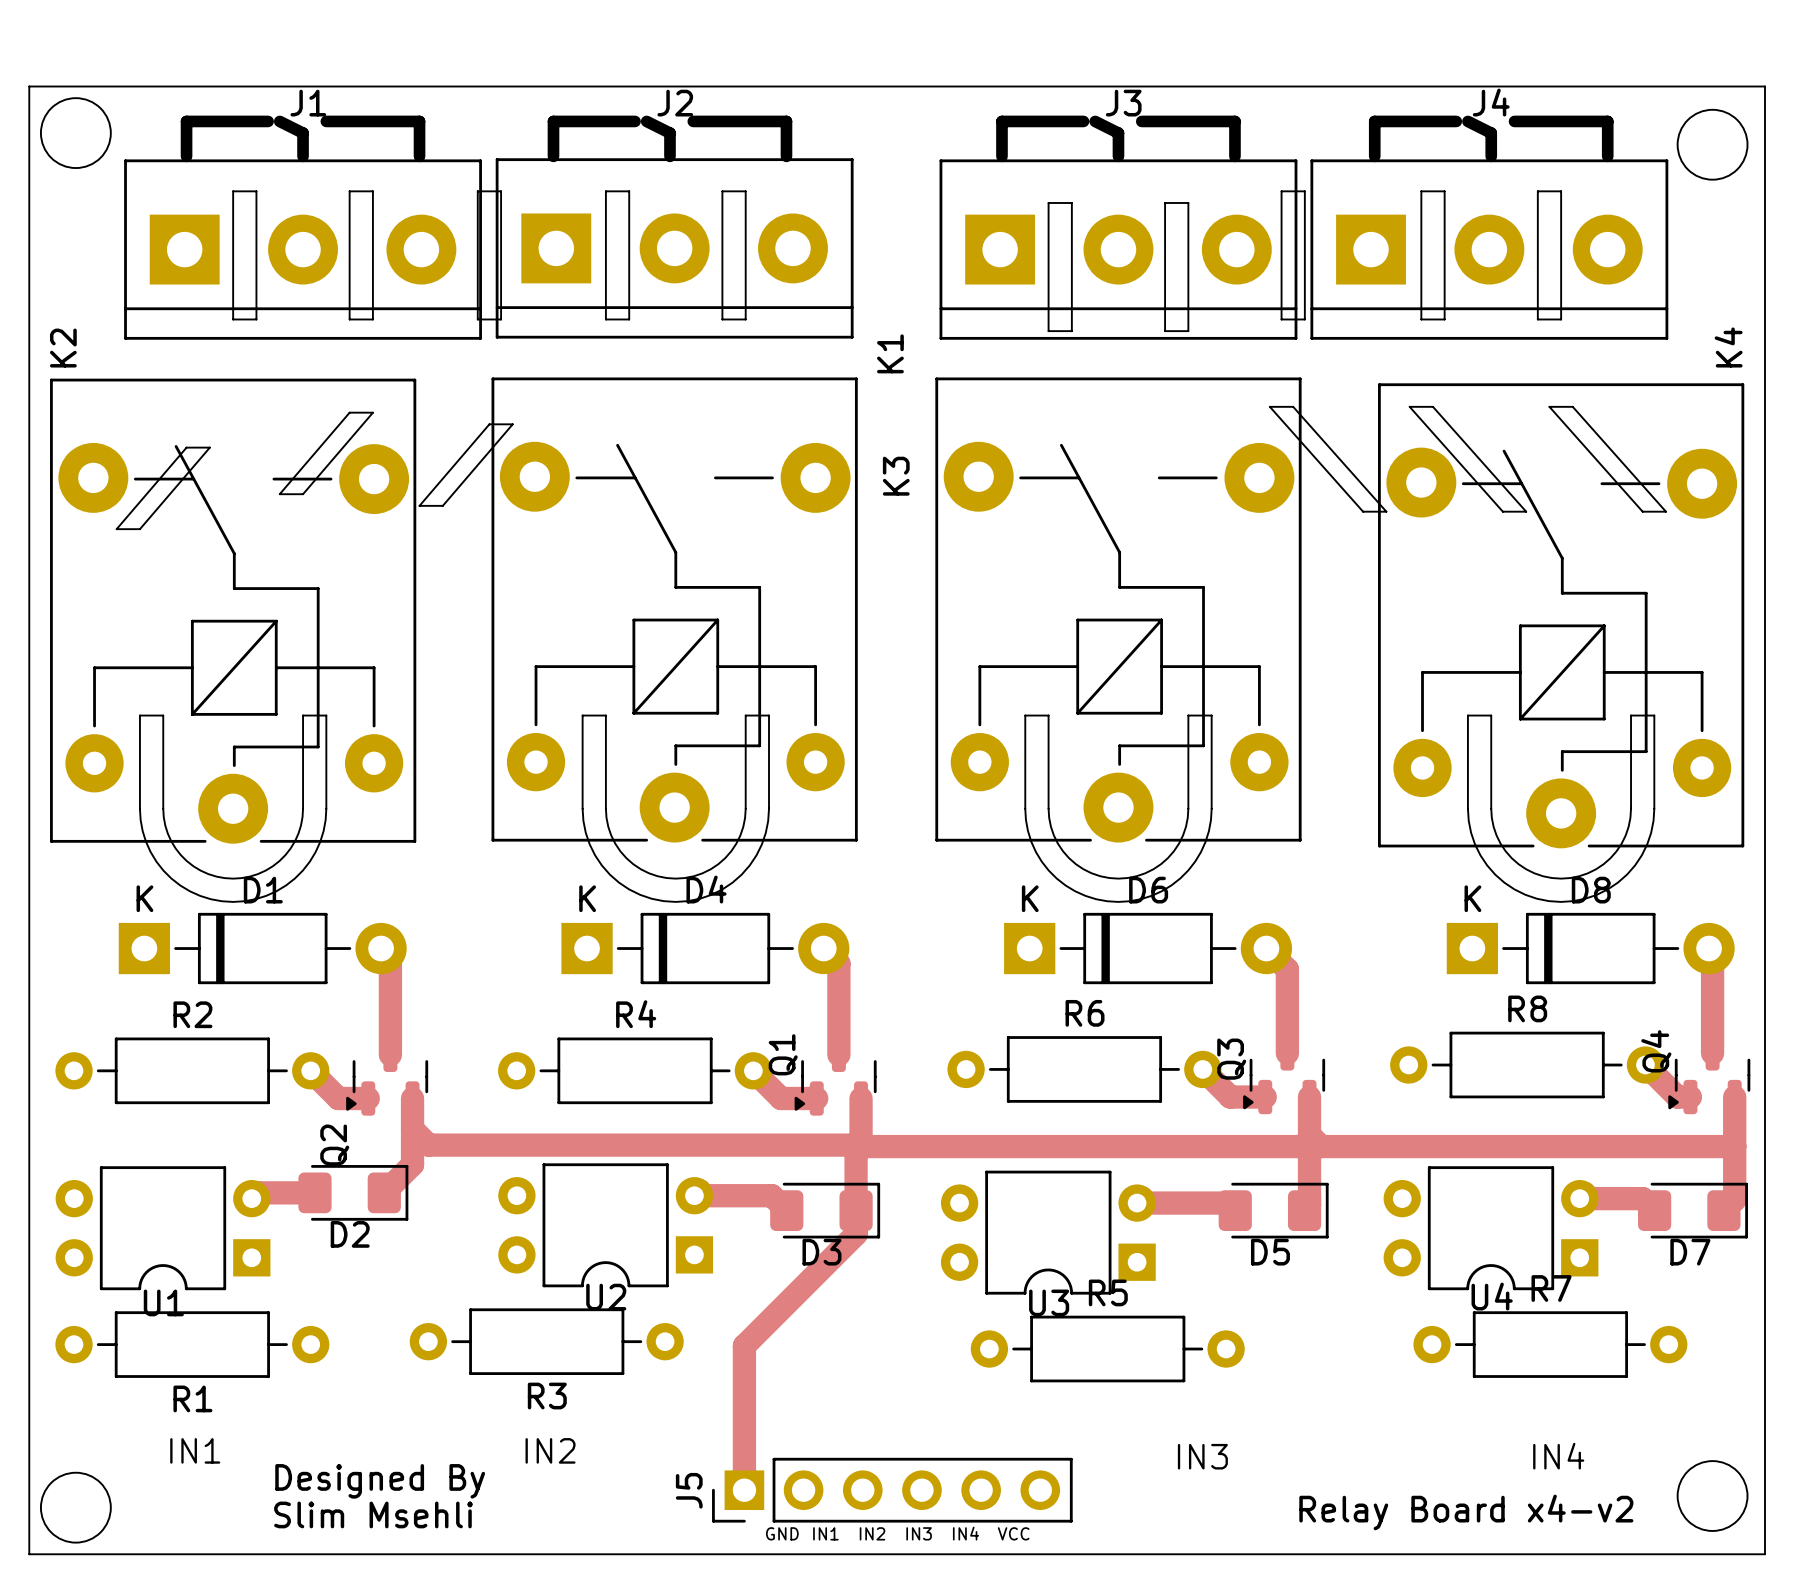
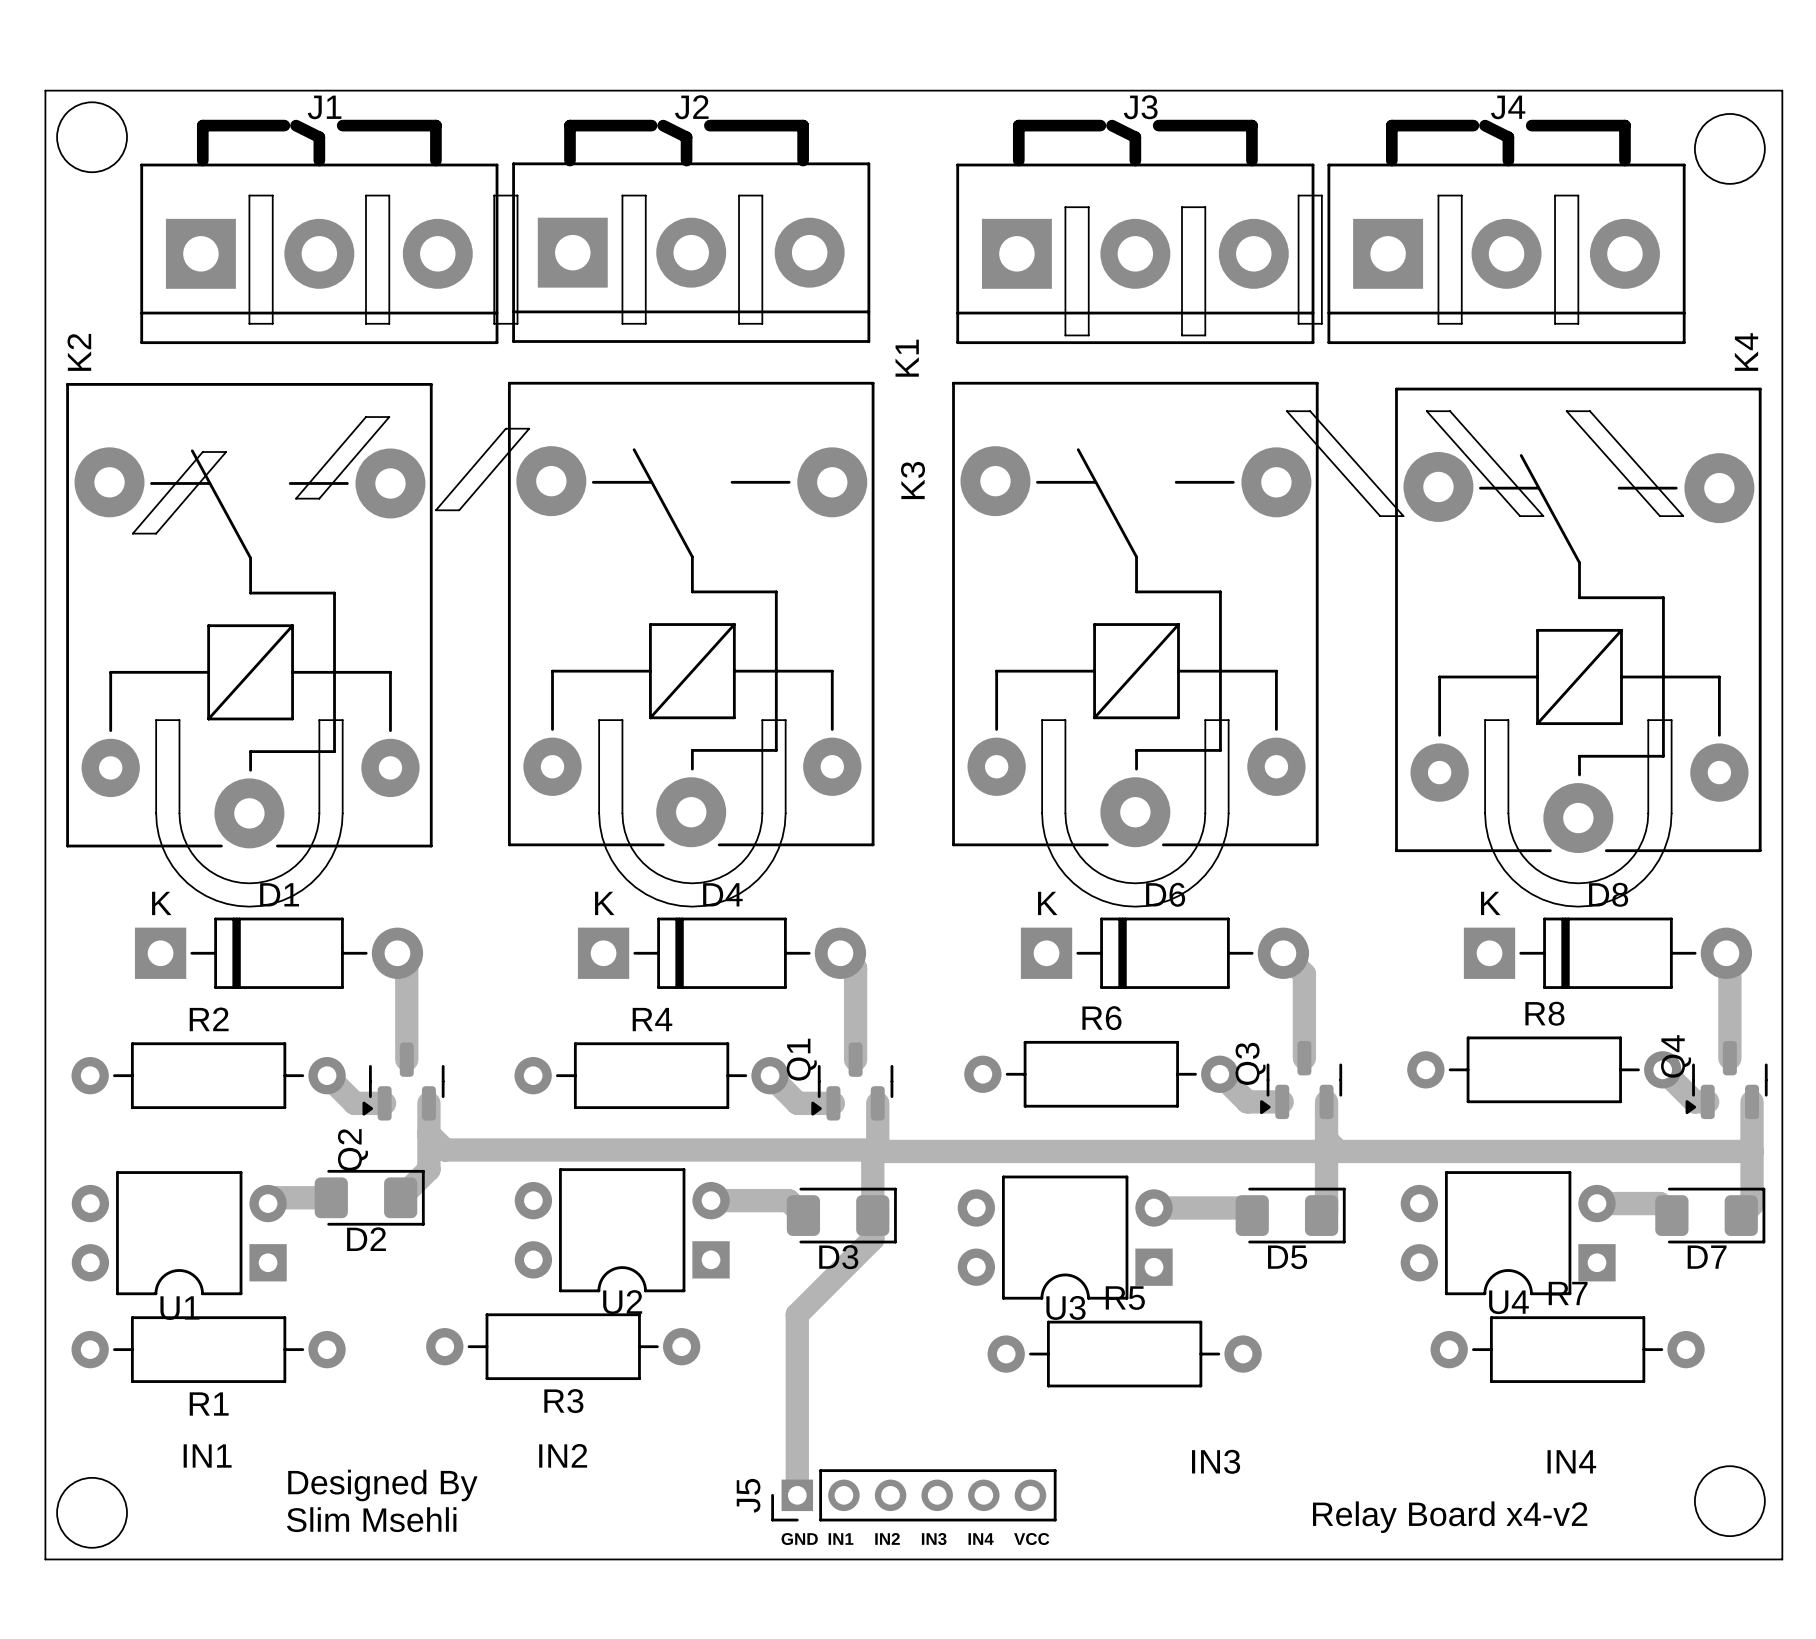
track: (780, 1309) (744, 1345) (744, 1490) -> (797, 1314) (797, 1495)
J5 footprint: [712, 1457, 1073, 1523] -> [771, 1469, 1057, 1522]

